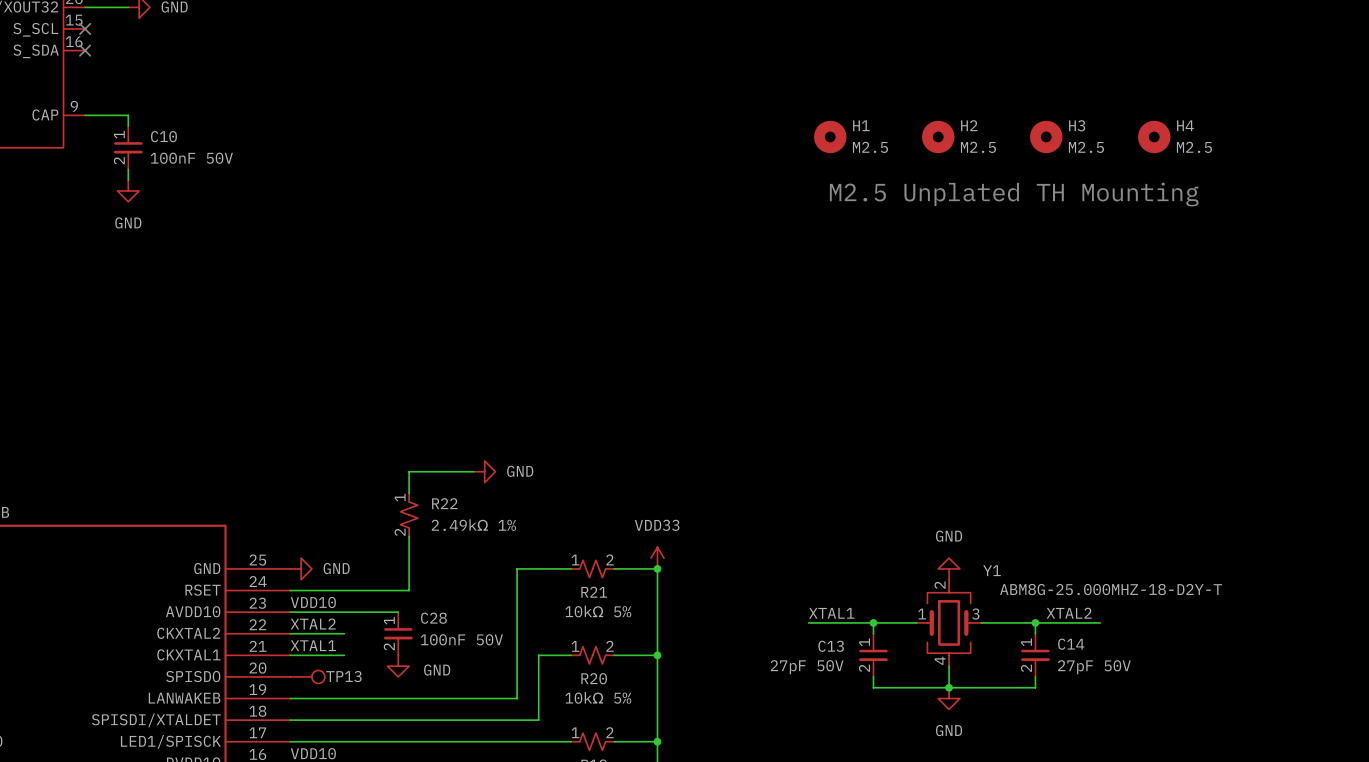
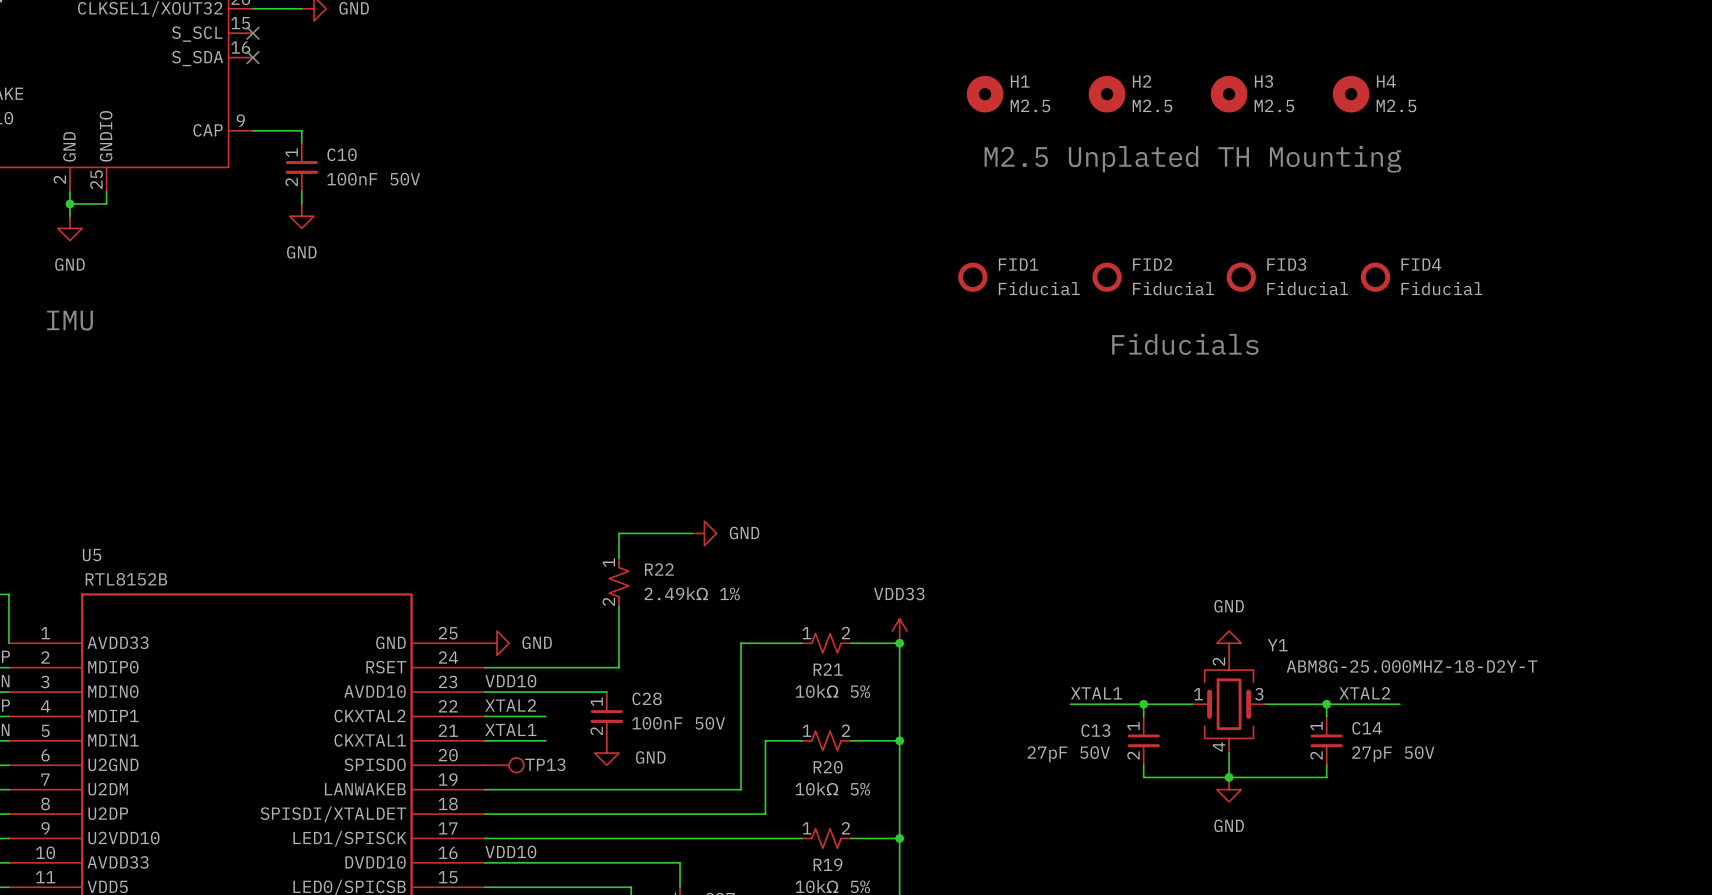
H1 position: (830, 136) -> (985, 94)
H2 position: (938, 136) -> (1107, 94)
H3 position: (1046, 136) -> (1229, 94)
H4 position: (1154, 136) -> (1351, 94)
text position: M2.5 Unplated TH Mounting (1014, 194) -> M2.5 Unplated TH Mounting (1192, 159)
FID1: none -> Fiducial (972, 277)
FID2: none -> Fiducial (1107, 277)
FID3: none -> Fiducial (1241, 277)
FID4: none -> Fiducial (1375, 277)
text: none -> Fiducials (1185, 344)

